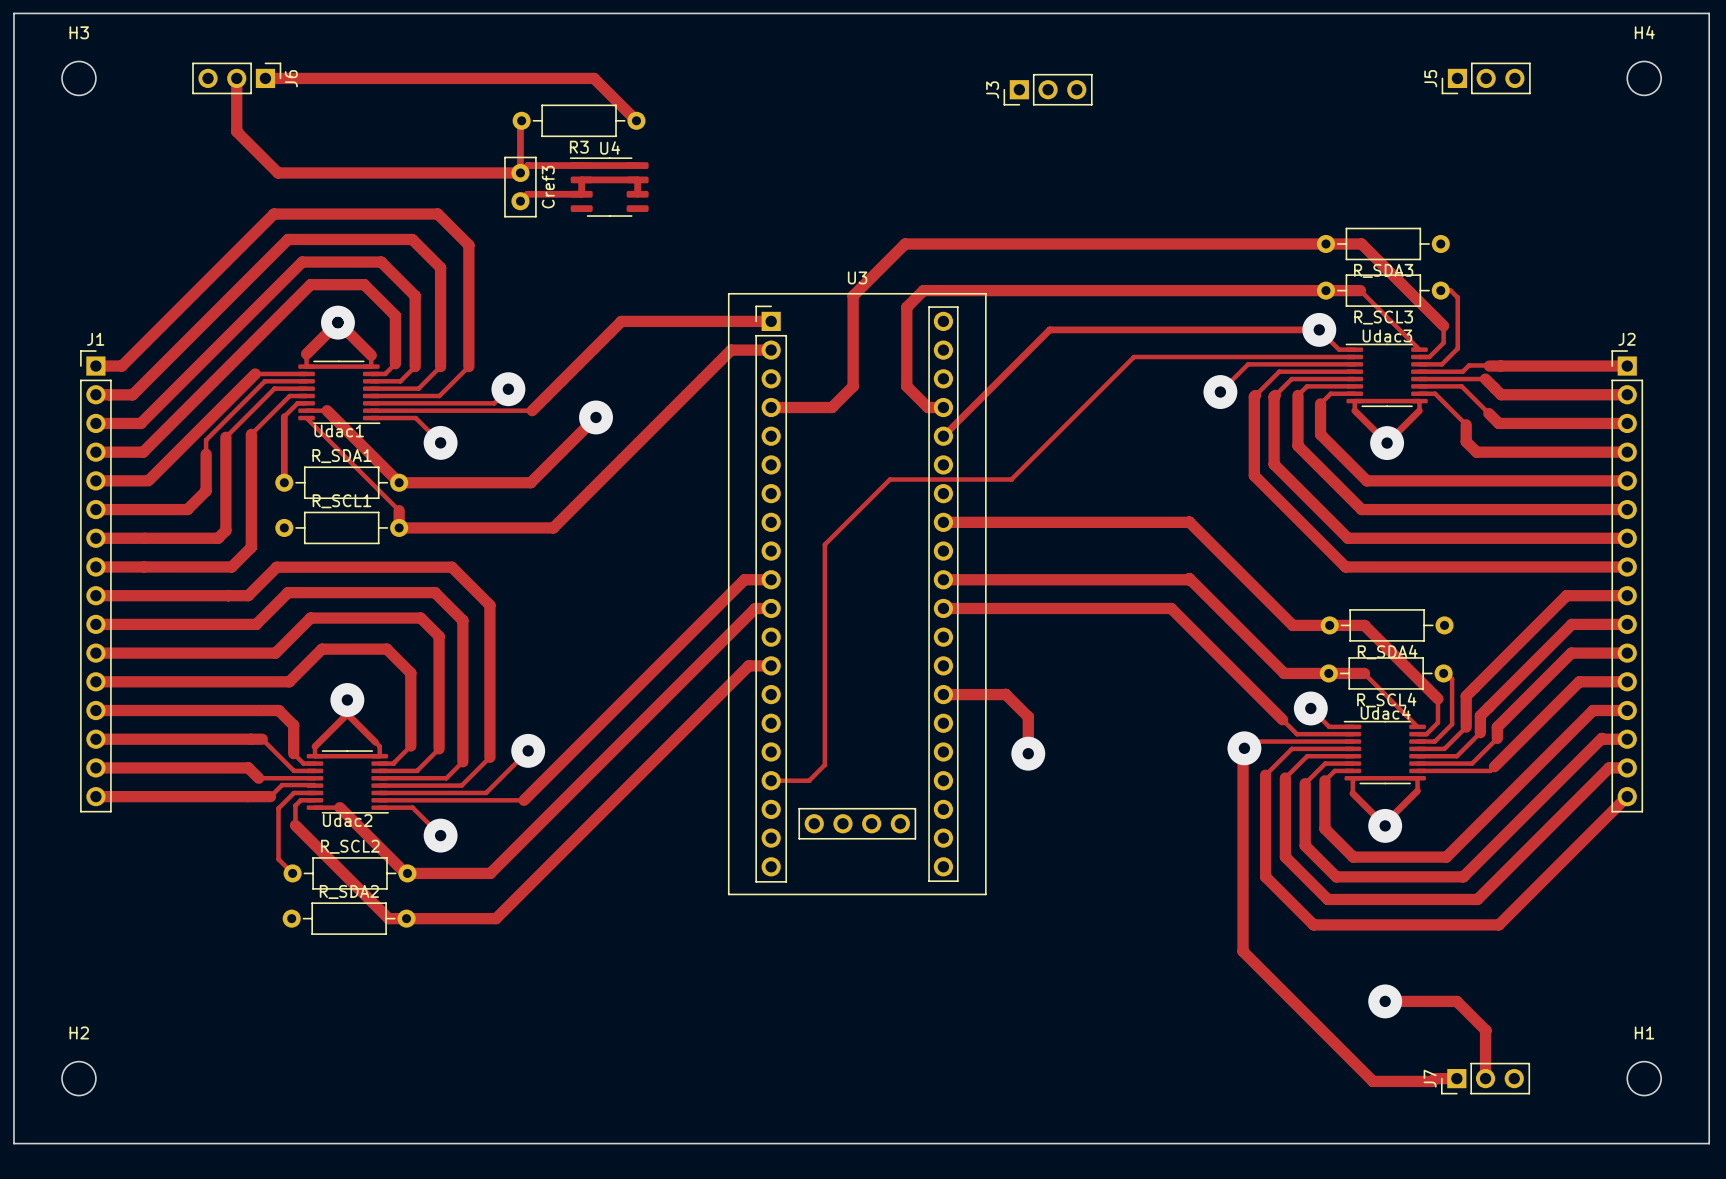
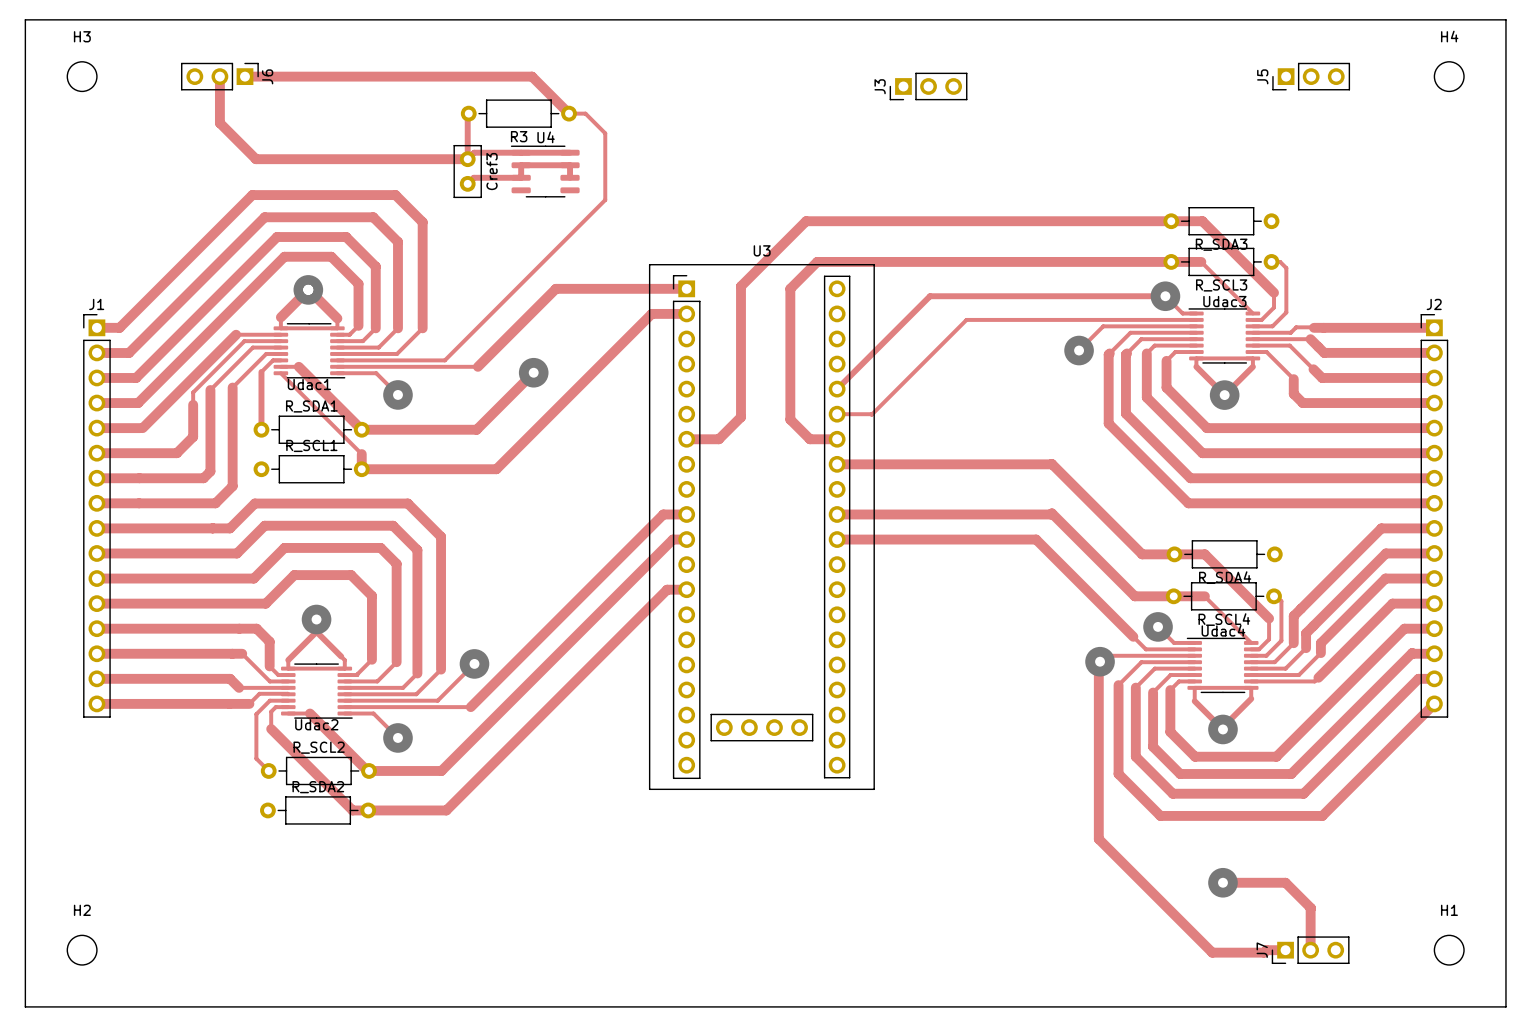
track: none -> (569, 113) (585, 113) (605, 133) (605, 200) (457, 348)
track: (907, 243) (905, 243) (853, 295) (853, 386) (831, 407) (771, 407) -> (806, 221) (740, 286) (740, 417) (718, 439) (686, 439)
track: (923, 290) (906, 307) (906, 386) (927, 407) (943, 407) -> (819, 261) (817, 261) (790, 288) (790, 419) (809, 439) (837, 439)
track: (1133, 357) (1011, 479) (889, 479) (824, 544) (824, 764) (809, 780) (771, 780) -> (1003, 319) (966, 319) (871, 414) (837, 414)
via: (508, 389) -> none
track: (943, 694) (1005, 694) (1028, 716) (1028, 753) -> none
via: (1028, 753) -> none

